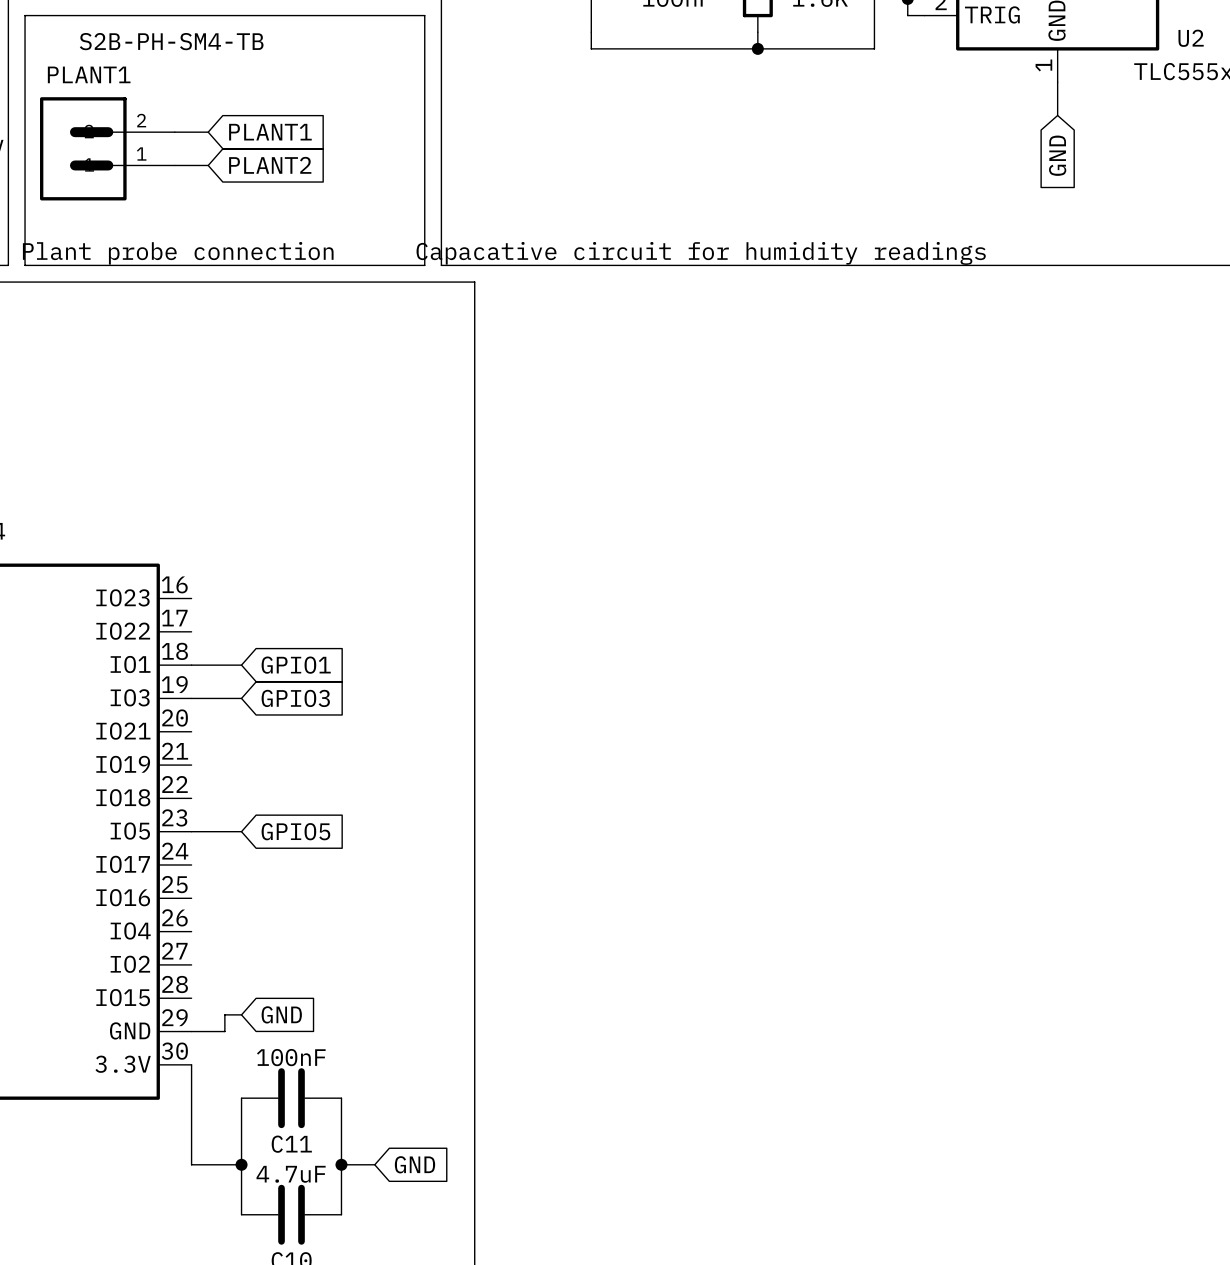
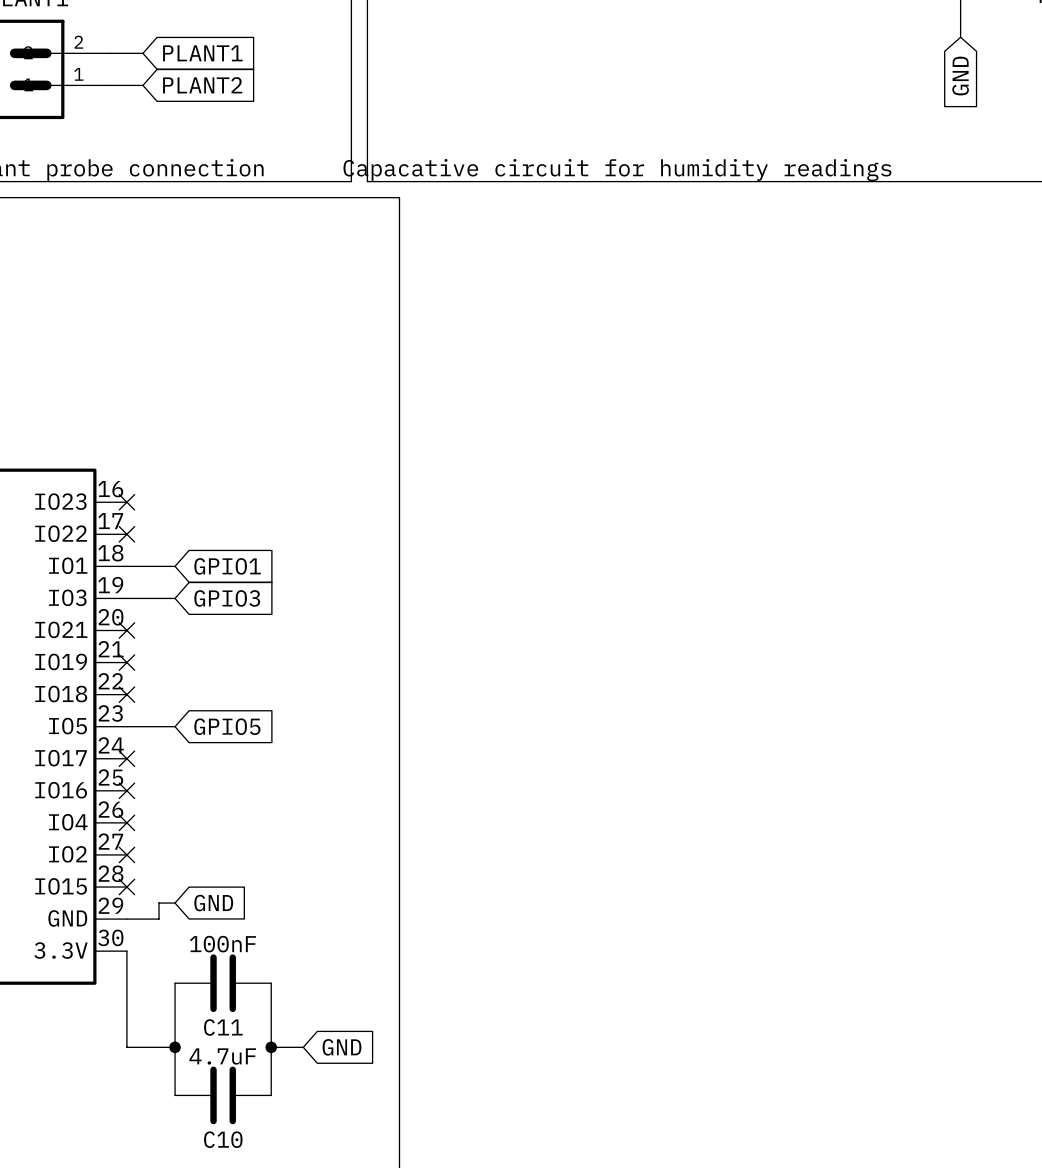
no-connect mark: none -> (126, 502)
no-connect mark: none -> (126, 534)
no-connect mark: none -> (126, 630)
no-connect mark: none -> (126, 662)
no-connect mark: none -> (126, 694)
no-connect mark: none -> (126, 758)
no-connect mark: none -> (126, 790)
no-connect mark: none -> (126, 822)
no-connect mark: none -> (126, 854)
no-connect mark: none -> (126, 887)

